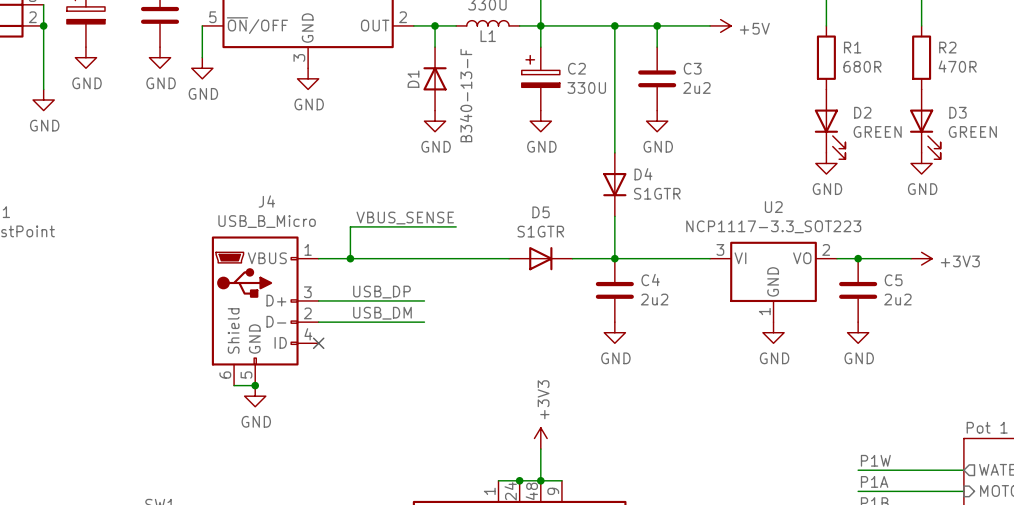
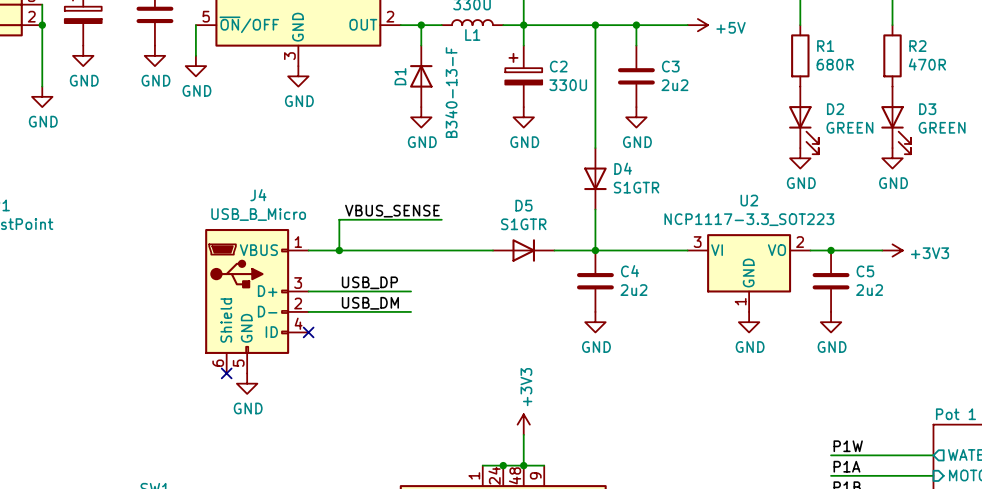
wire: (234, 385) (255, 385) -> none
no-connect mark: none -> (226, 373)
junction: (255, 385) -> none

